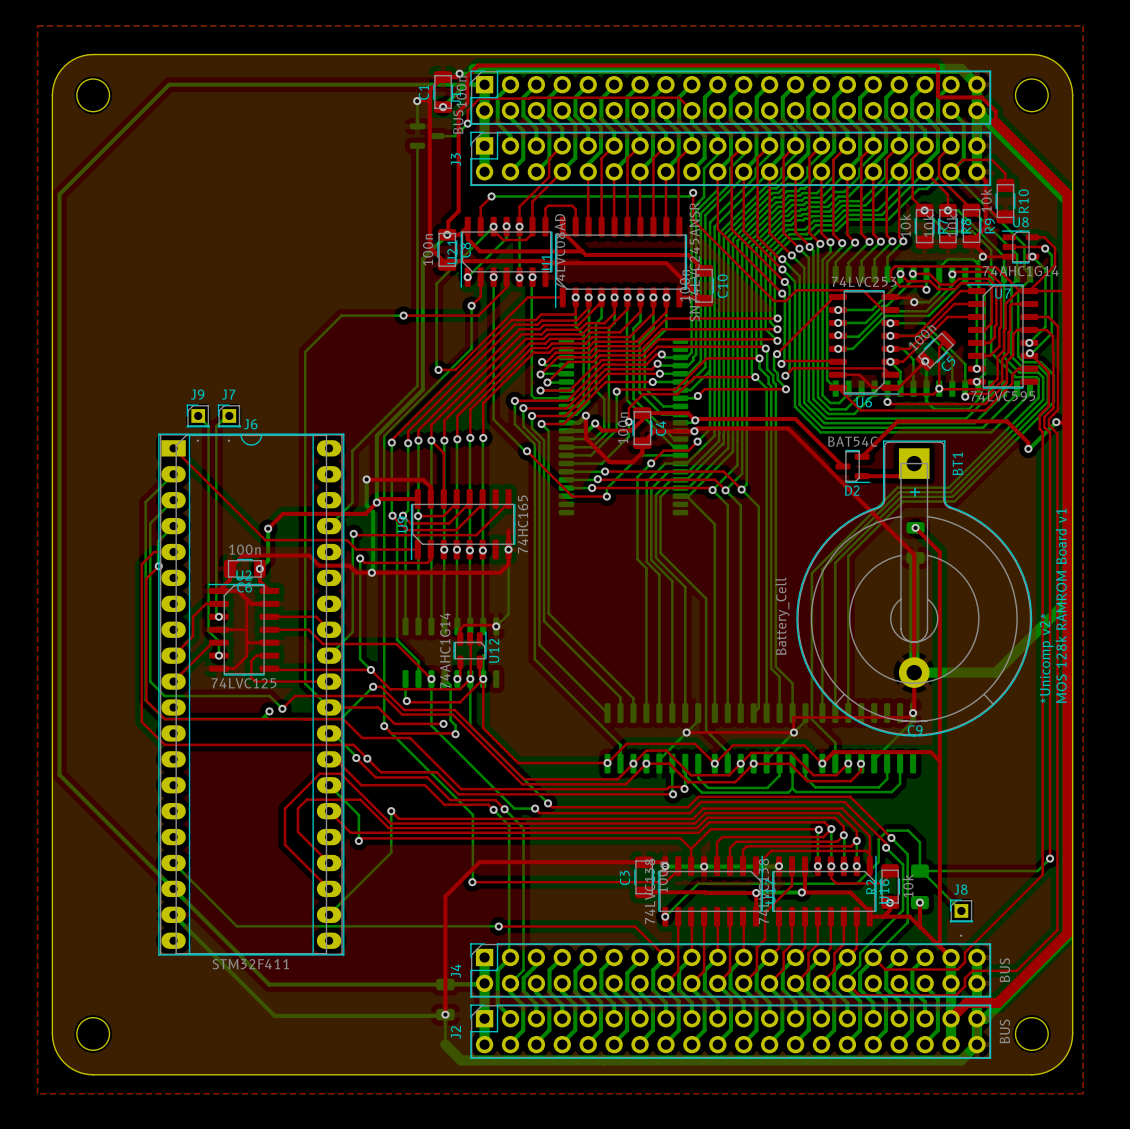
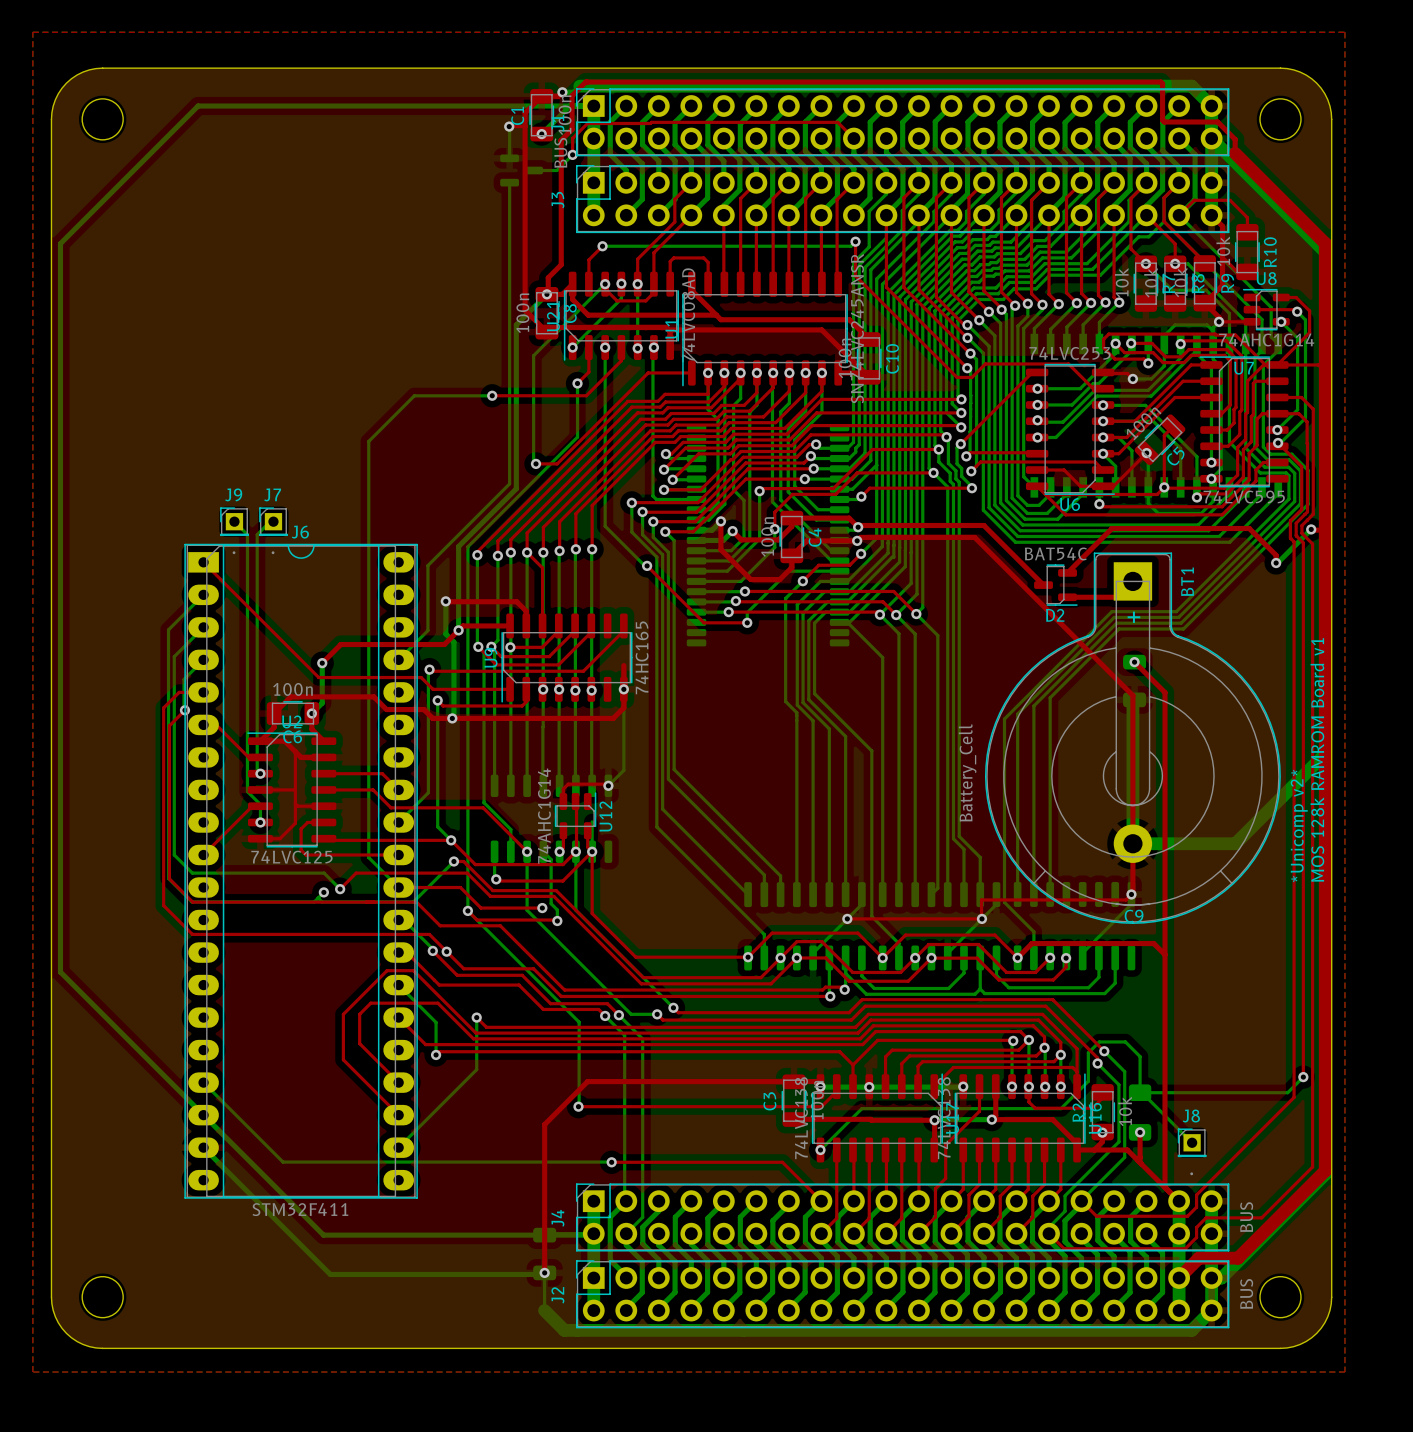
top track: (209, 603) (205, 603) (193, 616) (193, 636) (173, 655) -> (248, 757) (216, 724) (203, 724)

